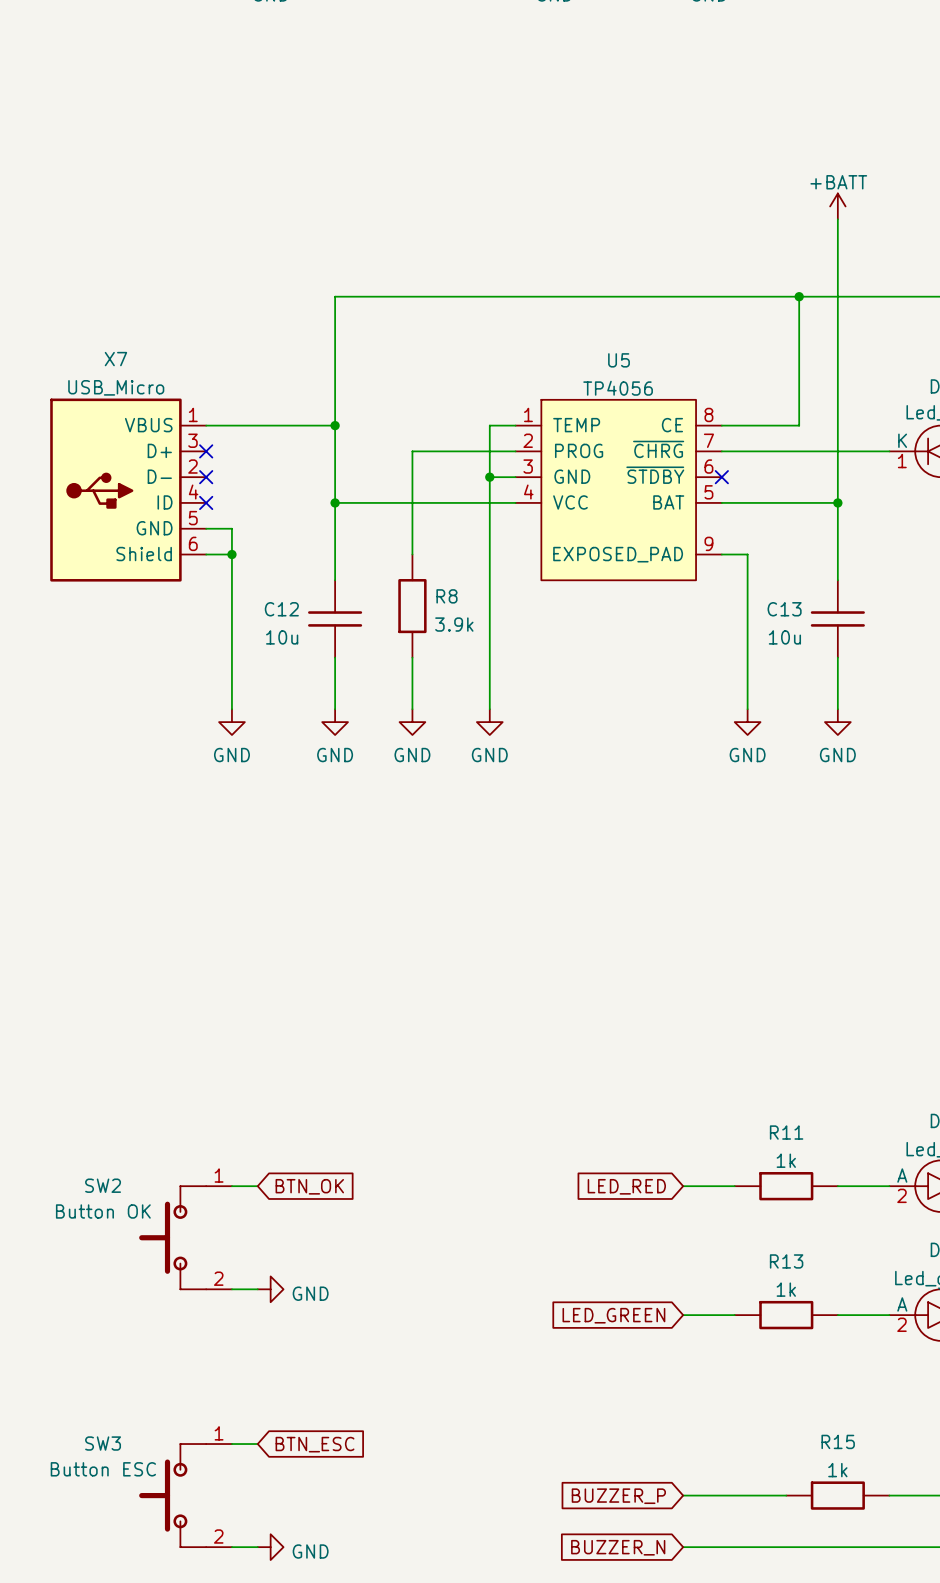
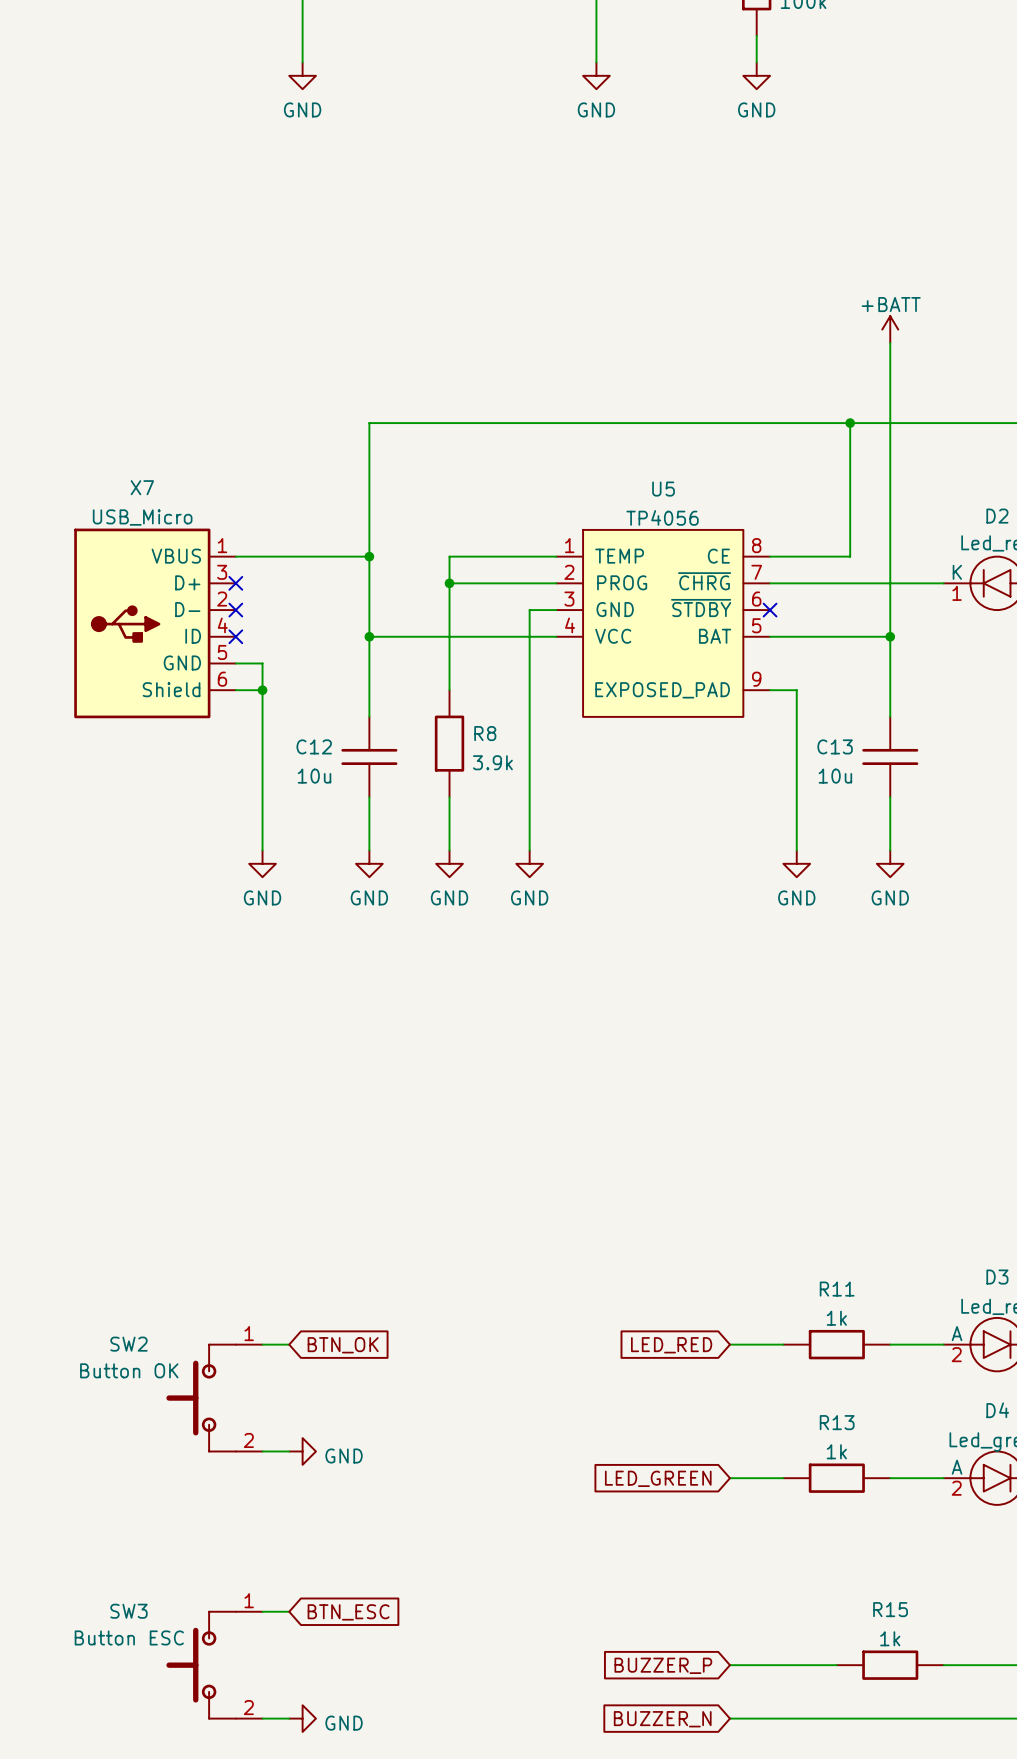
wire: (489, 425) (489, 477) -> (529, 556) (449, 556) (449, 583)
junction: none -> (449, 583)
junction: (489, 477) -> none

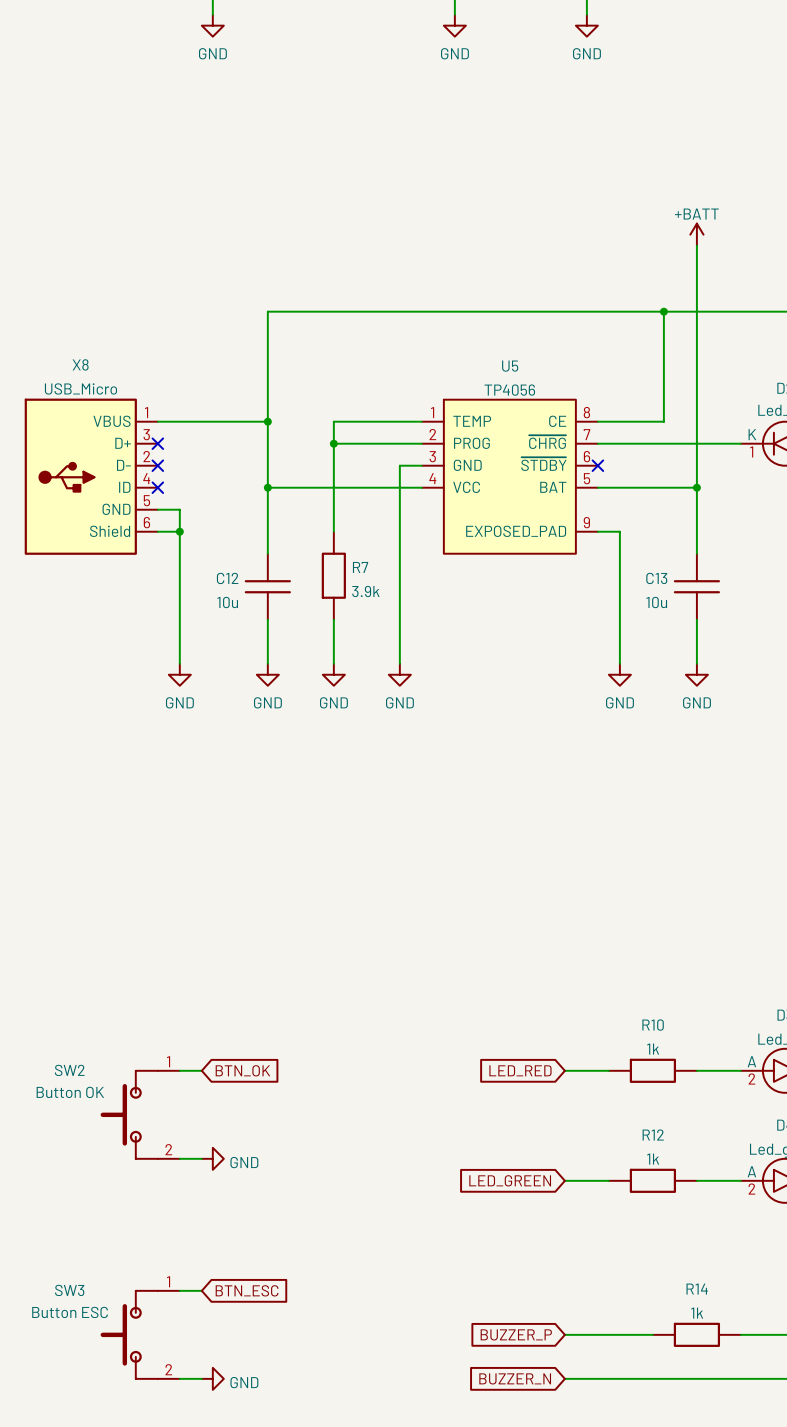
X7 name: X7 (142, 487) -> X8 (80, 364)
R8 name: R8 (485, 733) -> R7 (360, 567)
R11 name: R11 (837, 1289) -> R10 (653, 1025)
R13 name: R13 (837, 1422) -> R12 (653, 1134)
R15 name: R15 (890, 1609) -> R14 (697, 1289)

